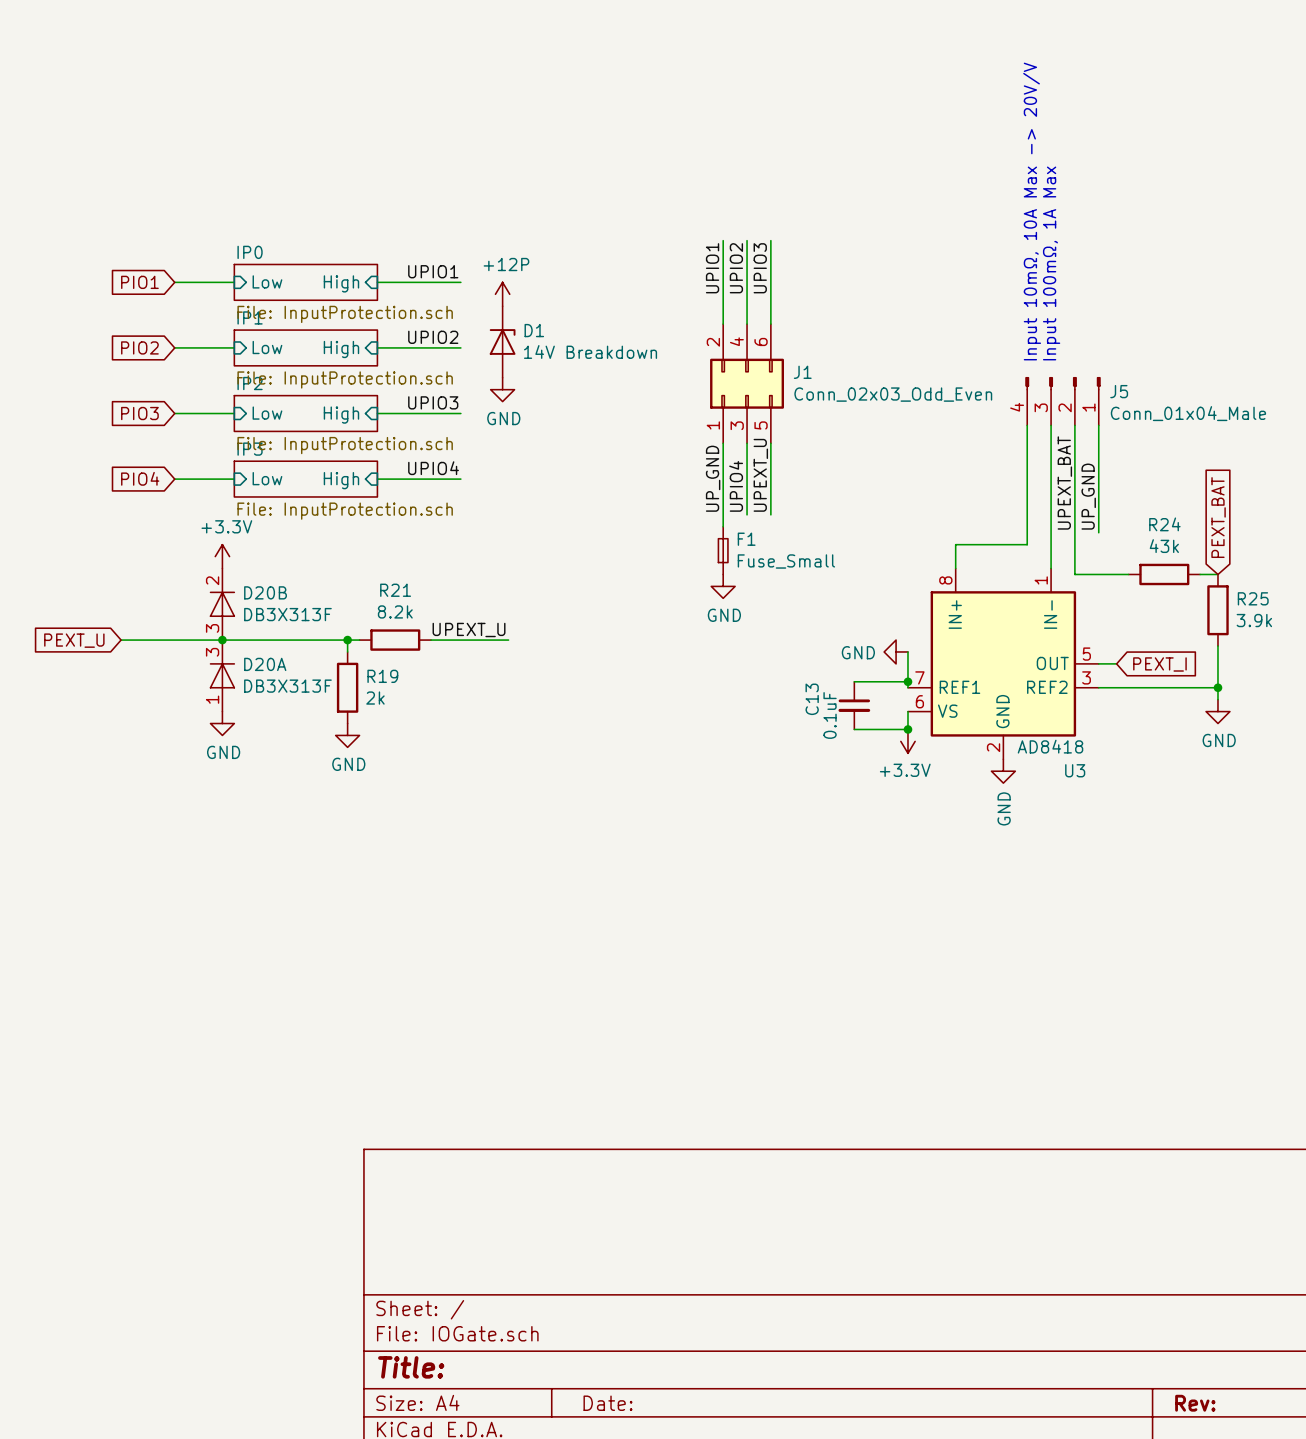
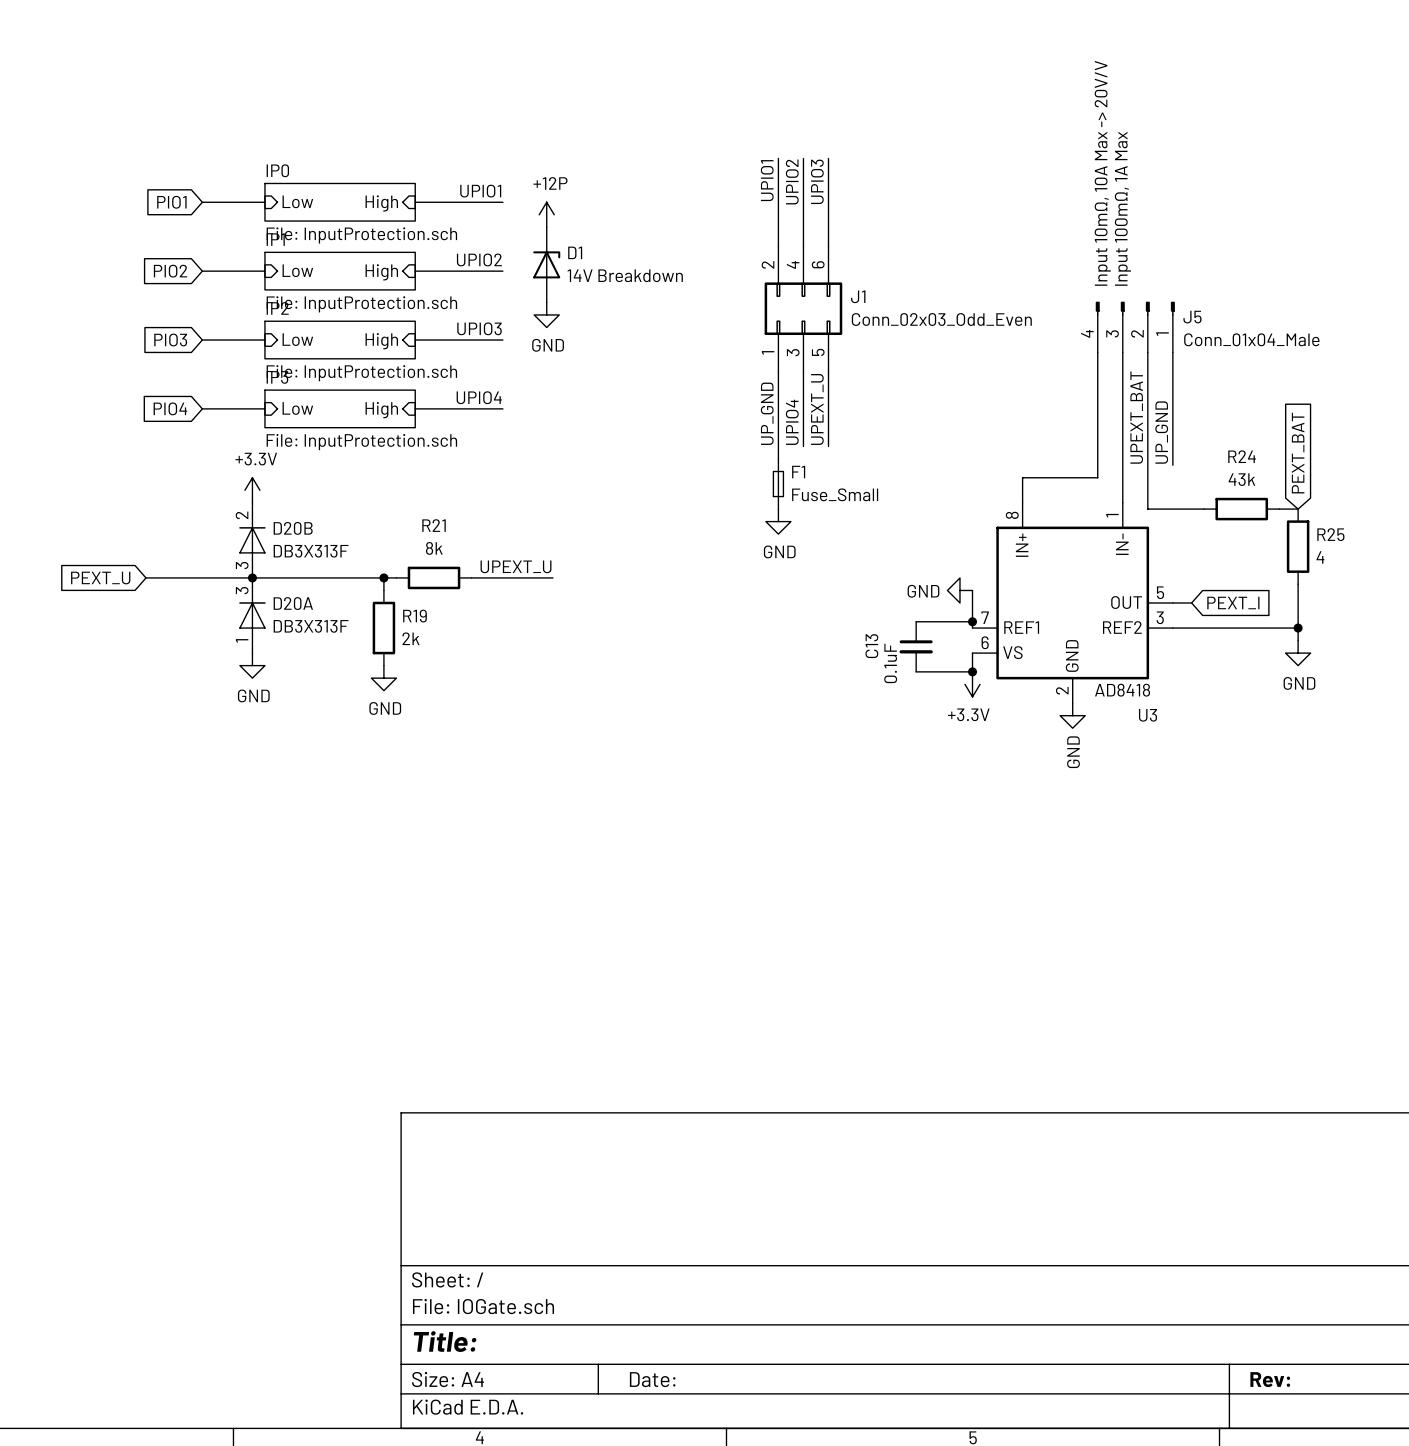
R21 value: 8.2k (395, 611) -> 8k (434, 548)
R25 value: 3.9k (1254, 620) -> 4 (1320, 557)

